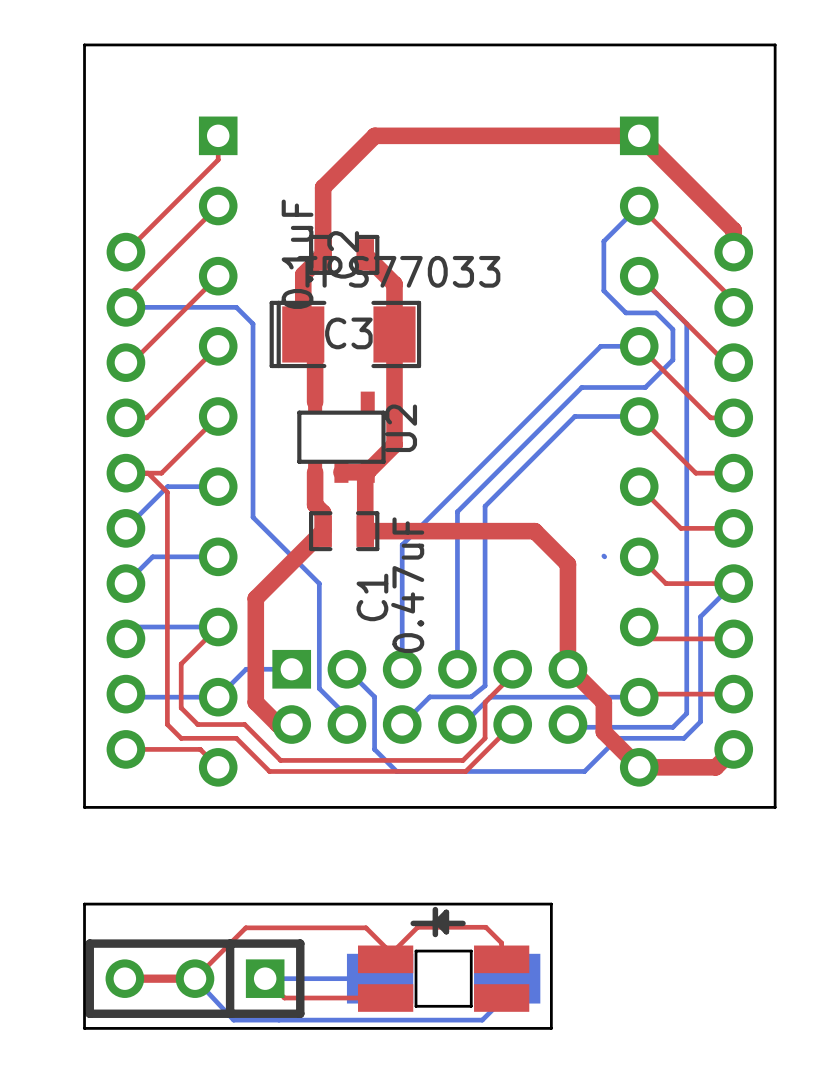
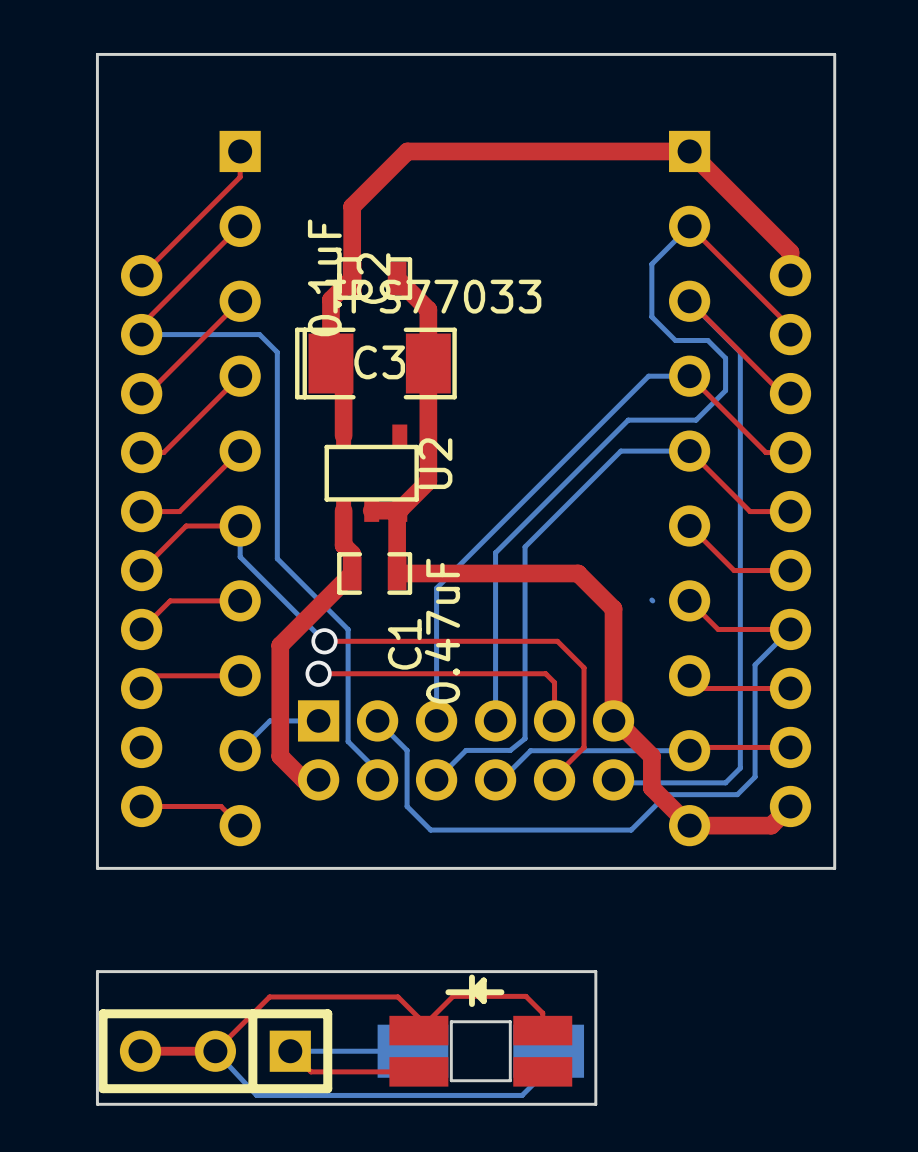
top track: (148, 473) (167, 492) (167, 724) (181, 738) (236, 738) (269, 771) (465, 771) (512, 724) -> (324, 641) (557, 641) (584, 667) (584, 747) (554, 776) (554, 779)
top track: none -> (240, 526) (186, 526) (141, 570)
bottom track: (218, 486) (167, 486) (125, 528) -> (240, 526) (240, 556) (324, 641)
top track: none -> (240, 600) (170, 600) (141, 629)
bottom track: (218, 556) (152, 556) (125, 583) -> none
via: none -> (324, 641)
via: none -> (318, 673)
top track: none -> (321, 673) (545, 673) (554, 682) (554, 720)
top track: (218, 627) (181, 664) (181, 707) (197, 724) (244, 724) (280, 760) (462, 760) (485, 738) (485, 702) (512, 674) -> (240, 675) (154, 675) (141, 688)
bottom track: (125, 638) (137, 627) (218, 627) (206, 638) -> none
bottom track: (125, 694) (128, 697) (218, 697) -> none

